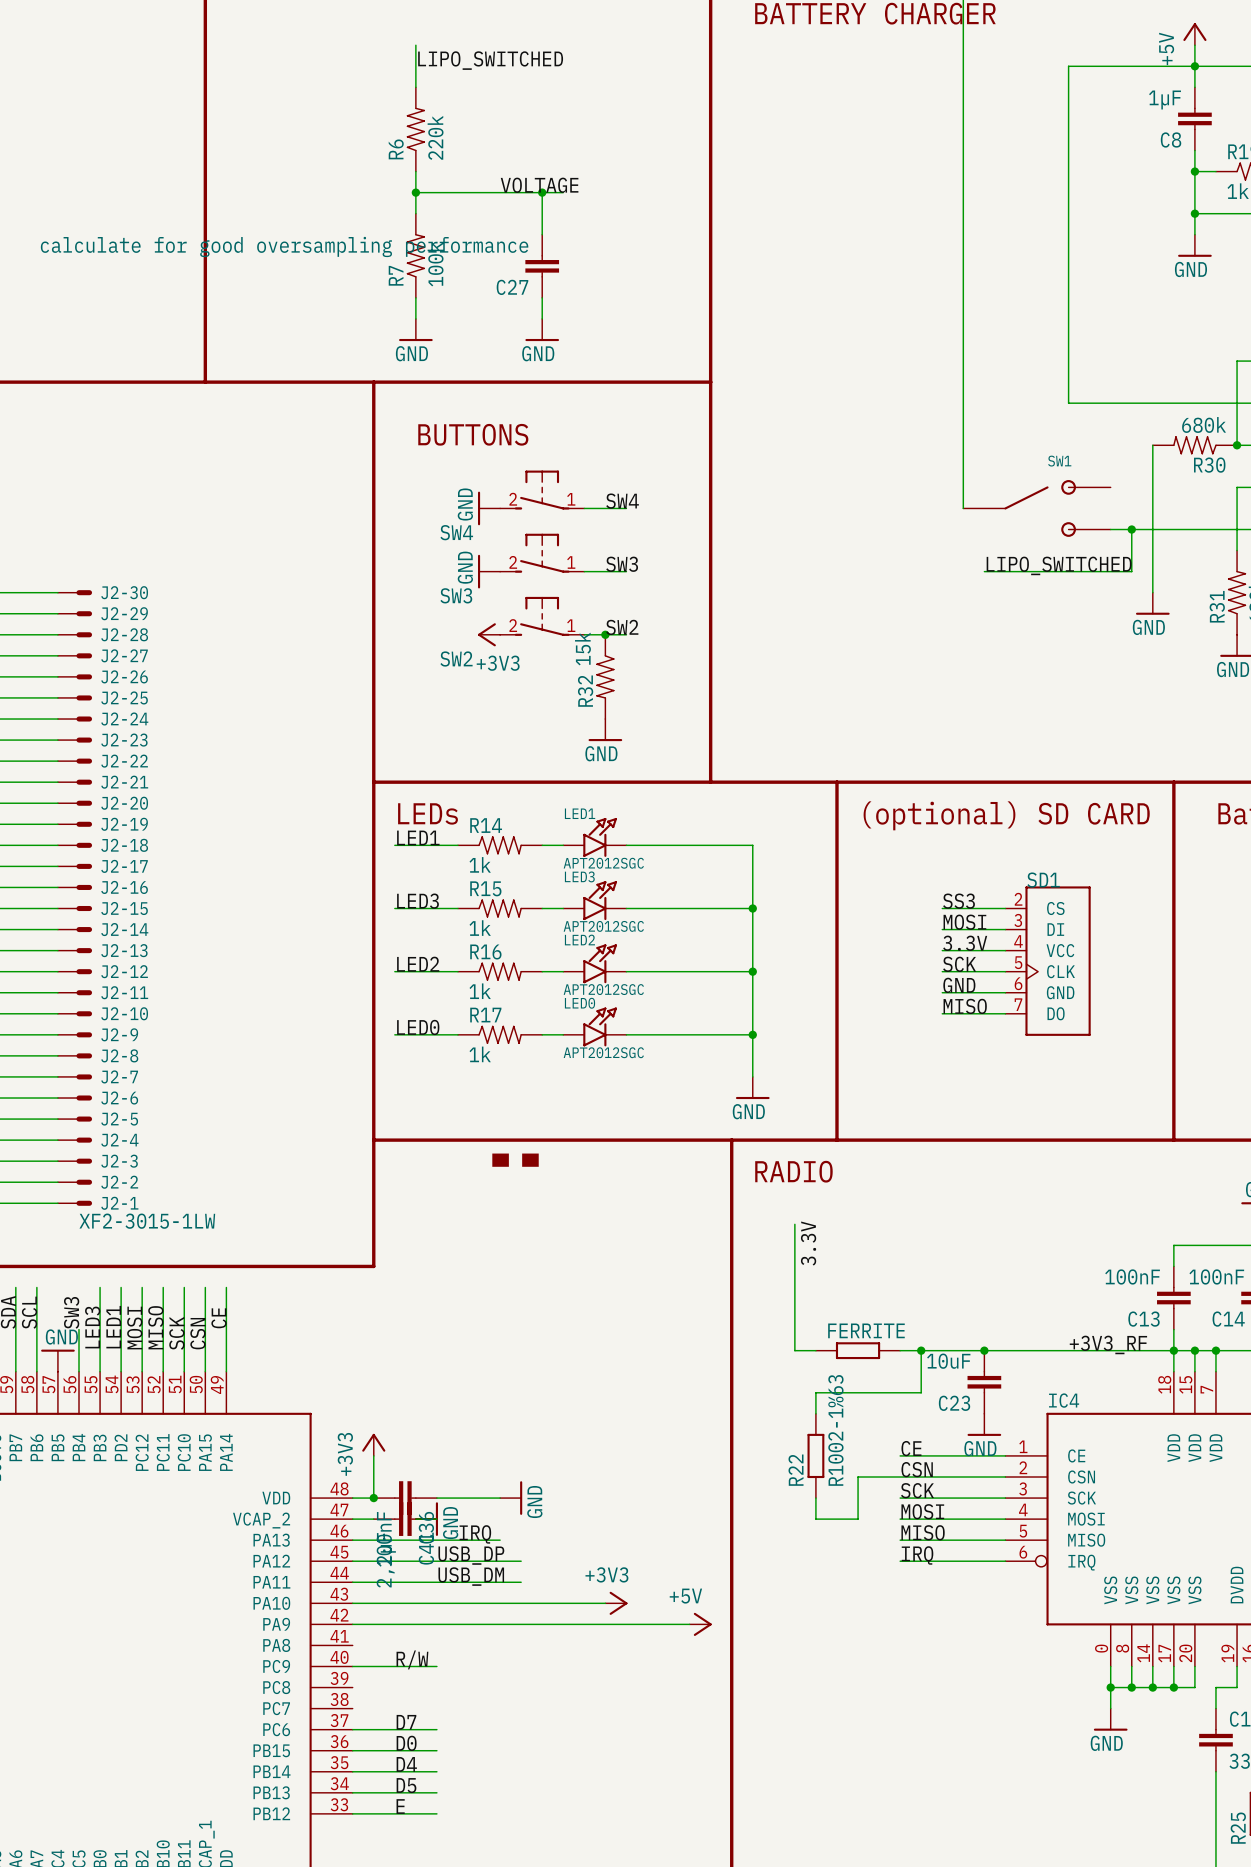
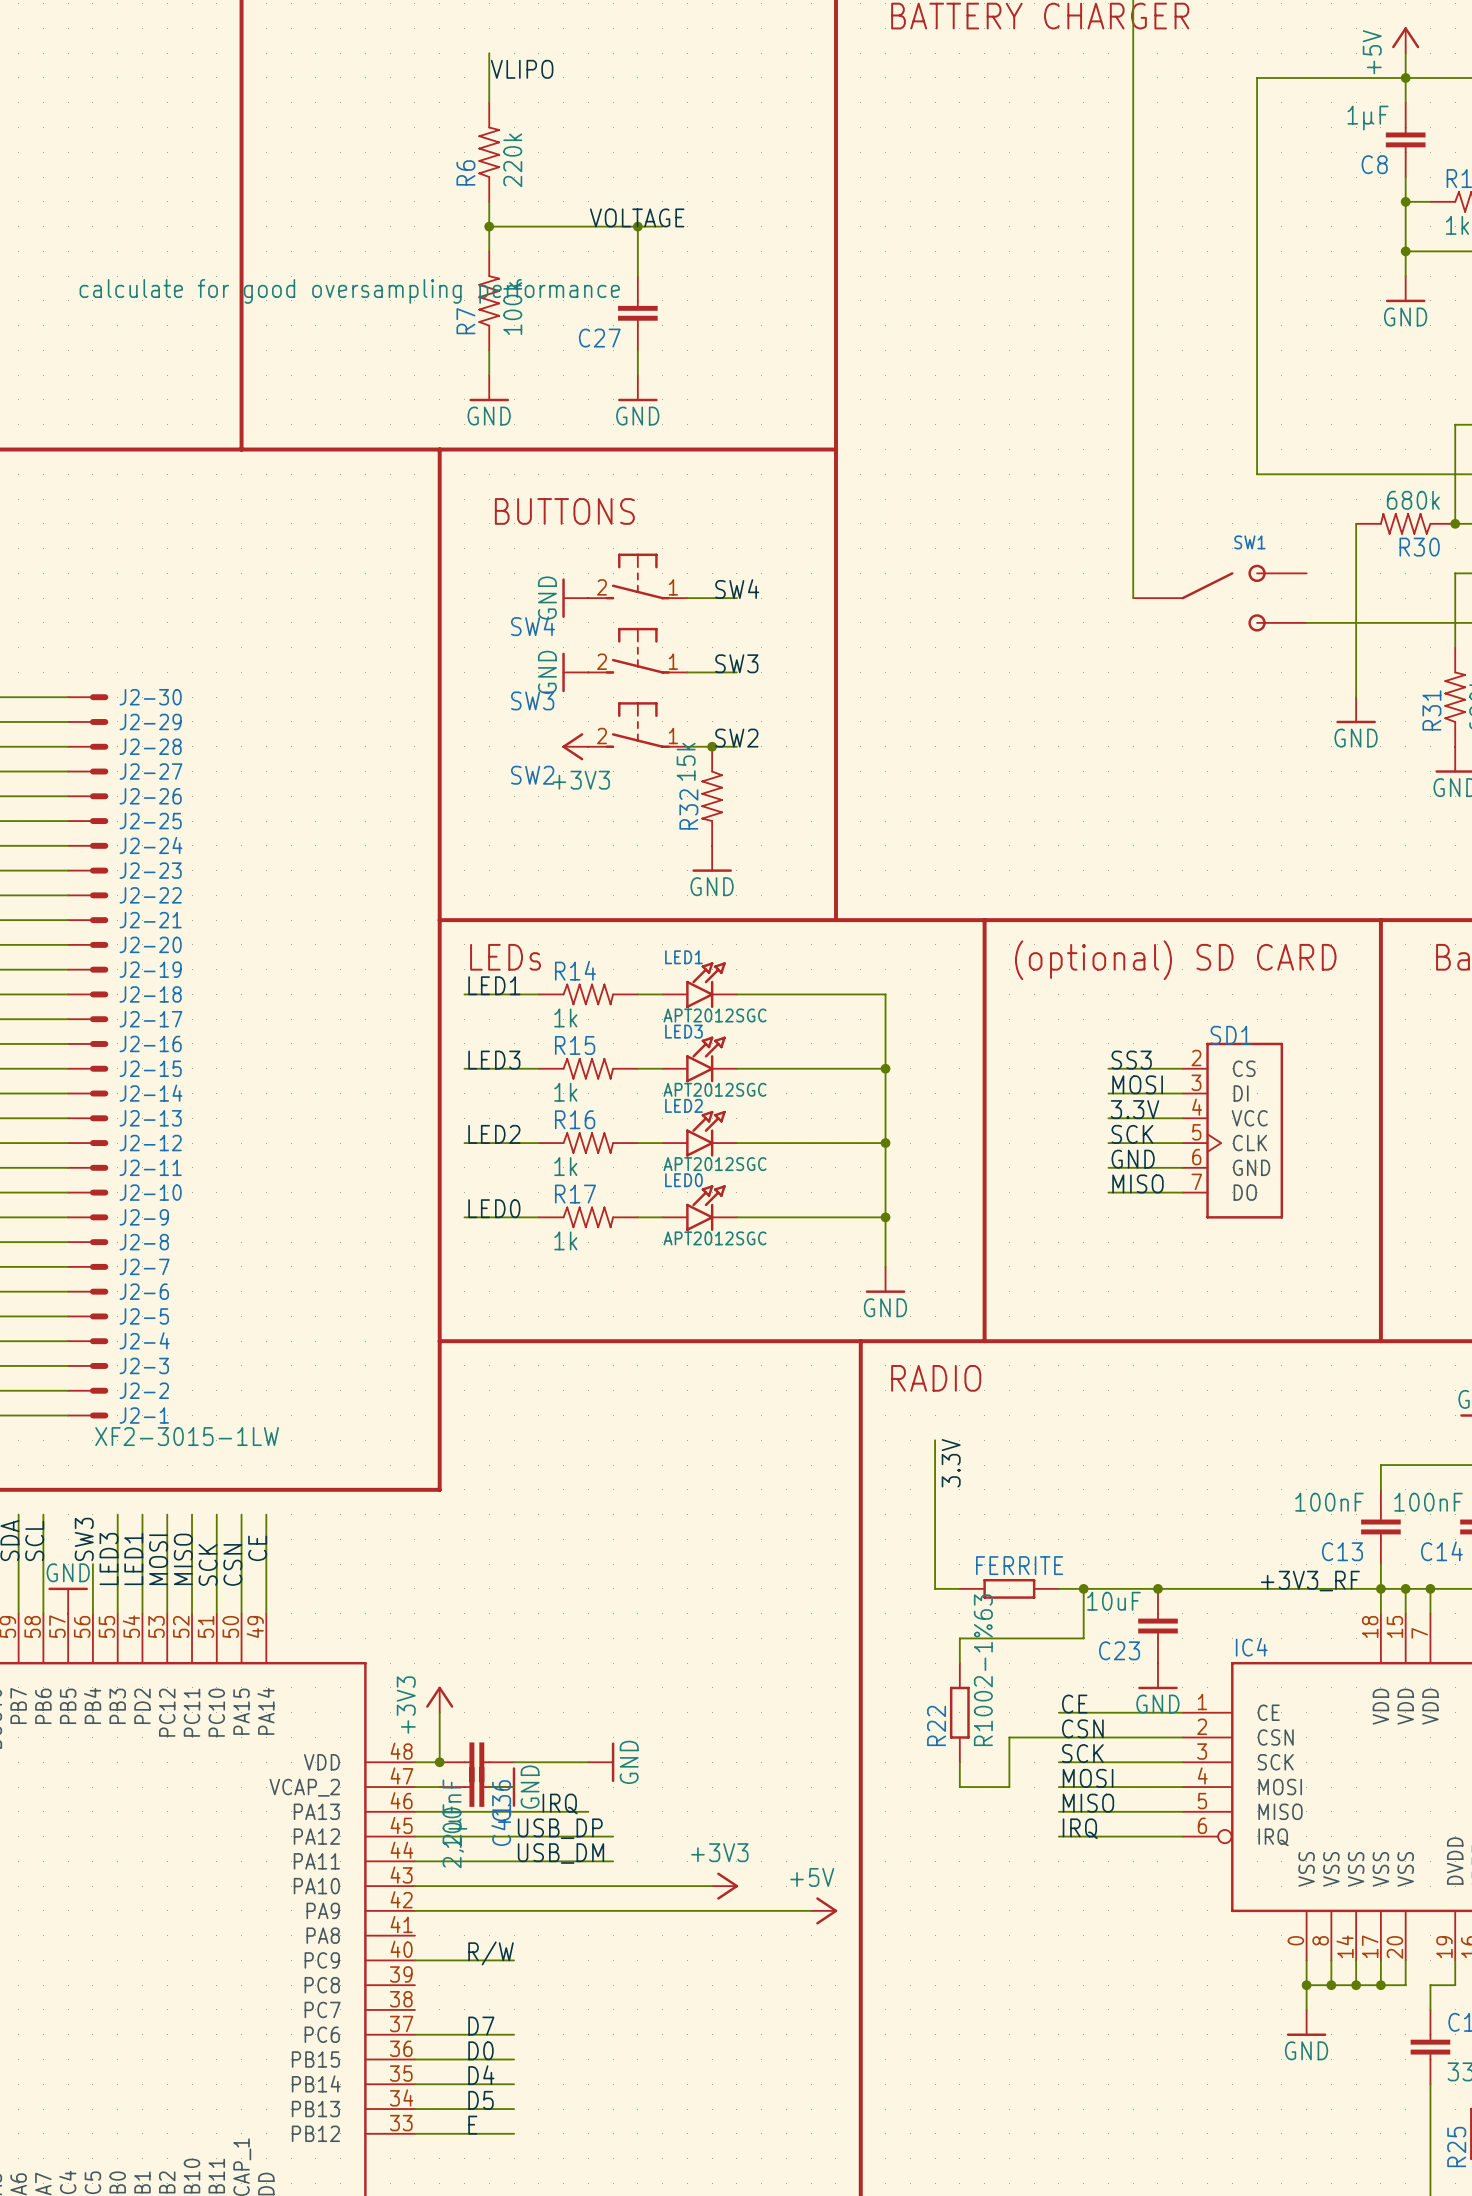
label: LIPO_SWITCHED (490, 60) -> VLIPO (522, 69)
wire: (1131, 529) (1131, 571) (984, 571) -> none
junction: (1131, 529) -> none
label: LIPO_SWITCHED (1059, 565) -> none
part: (515, 1160) -> none

